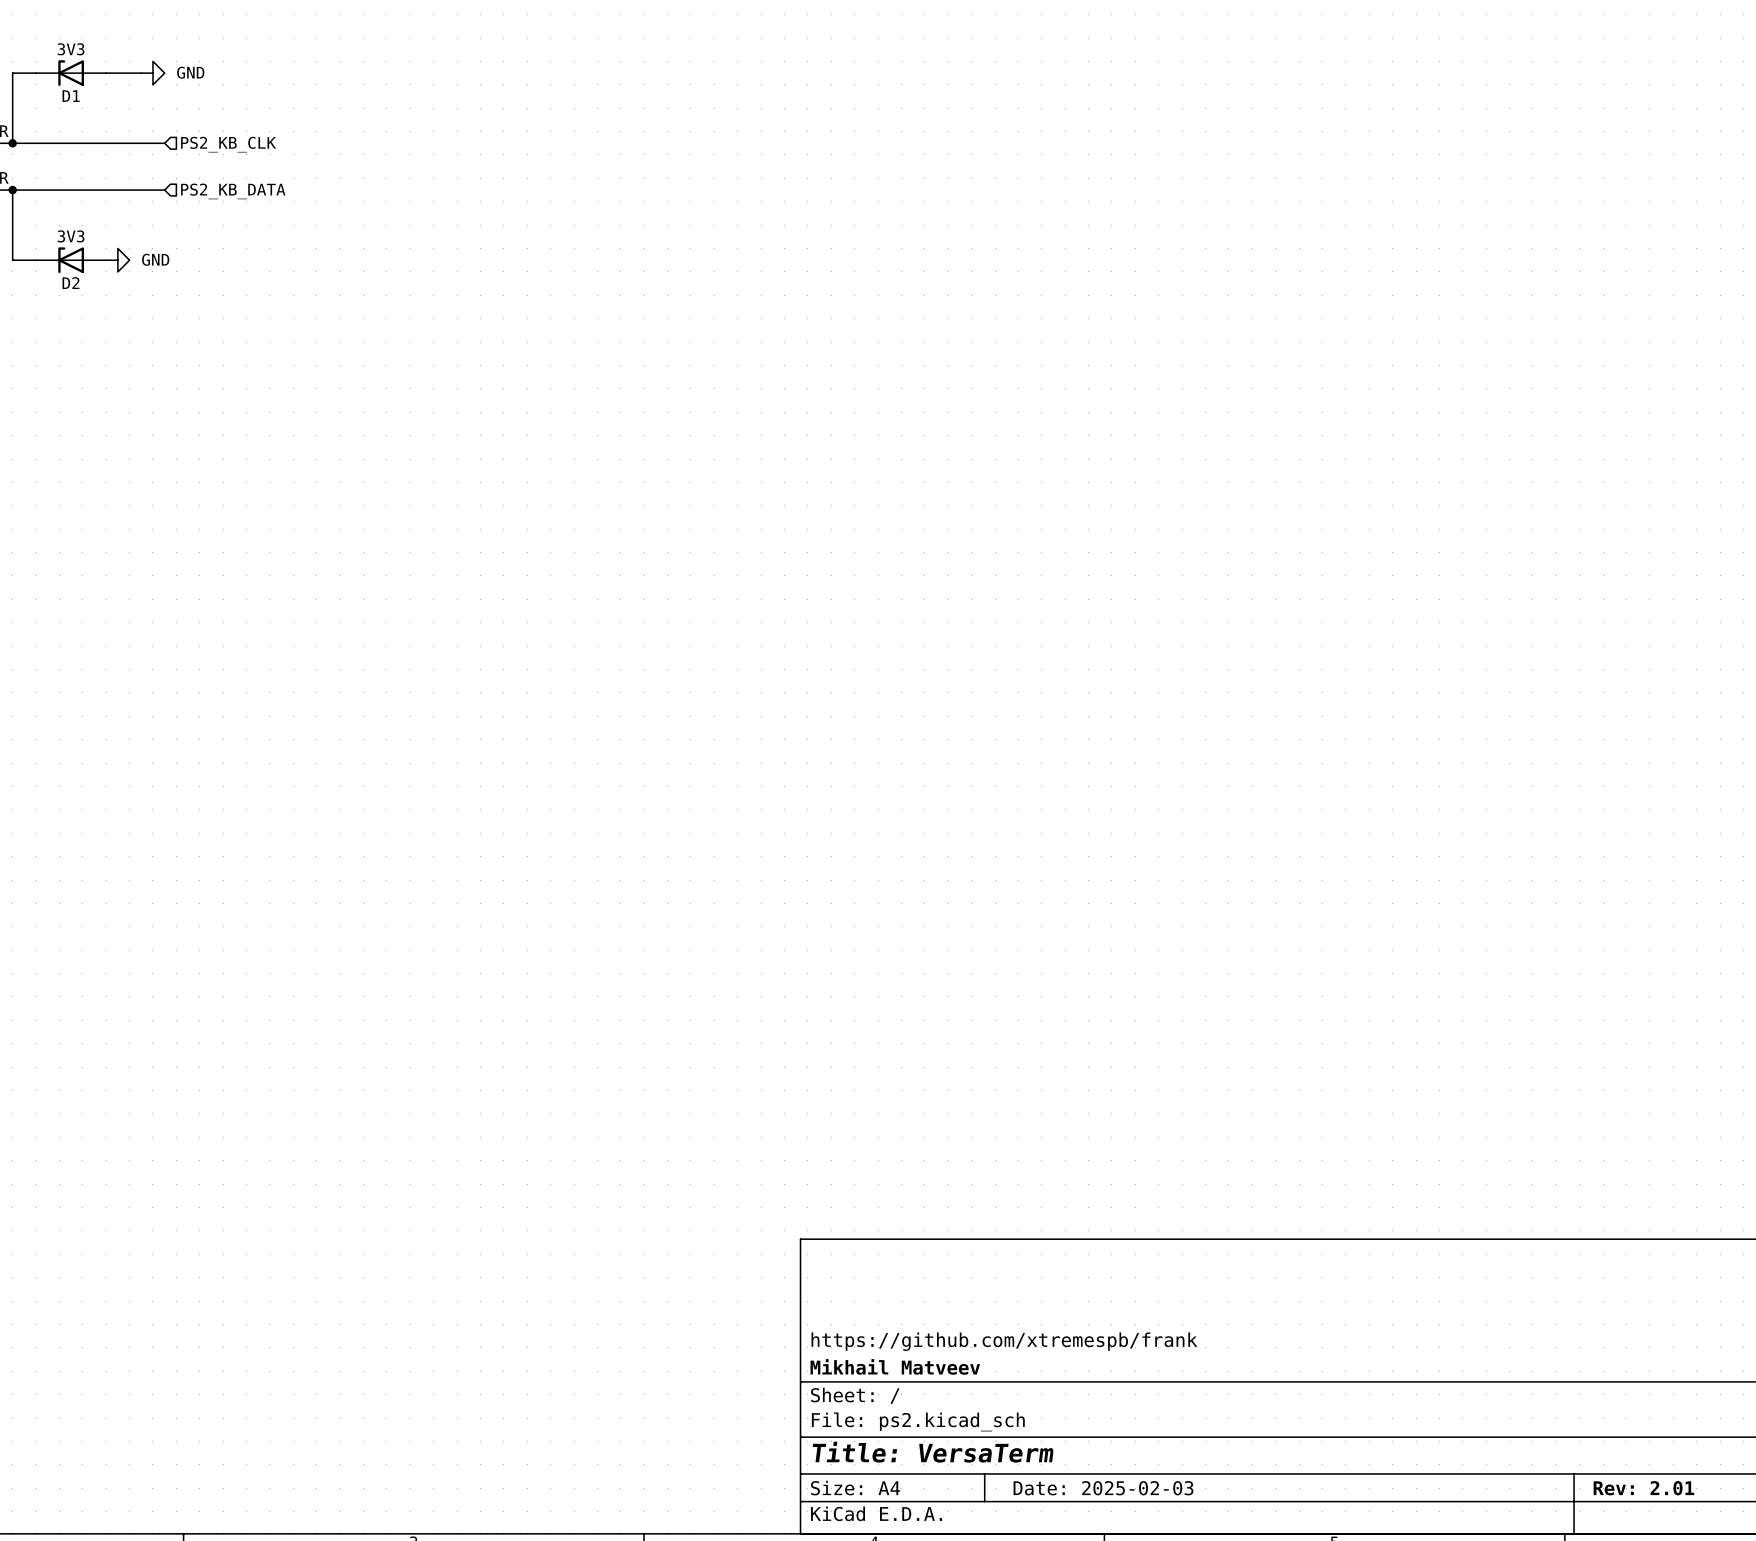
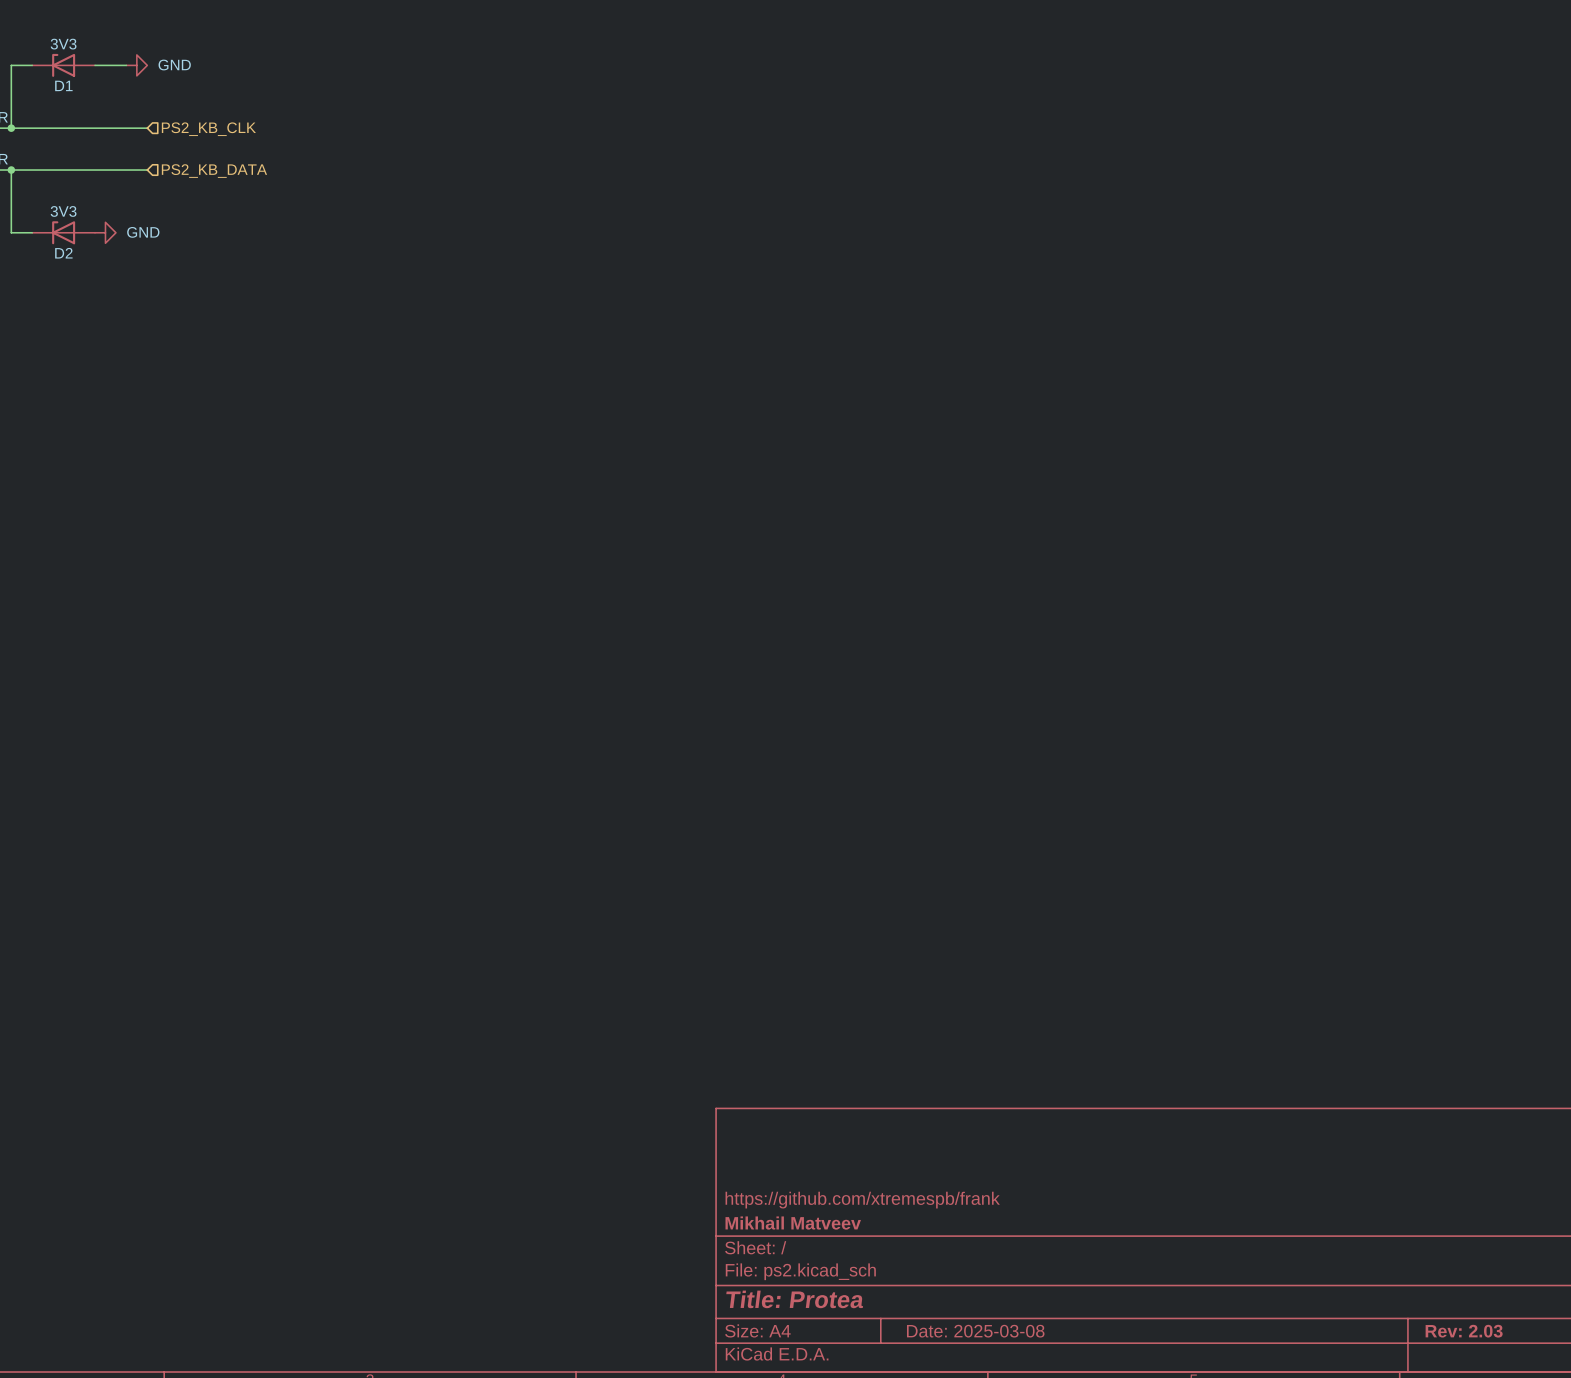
title block: Title: VersaTerm (933, 1452) -> Title: Protea (794, 1299)
title block: Date: 2025-02-03 (1103, 1488) -> Date: 2025-03-08 (975, 1331)
title block: Rev: 2.01 (1643, 1488) -> Rev: 2.03 (1464, 1331)

